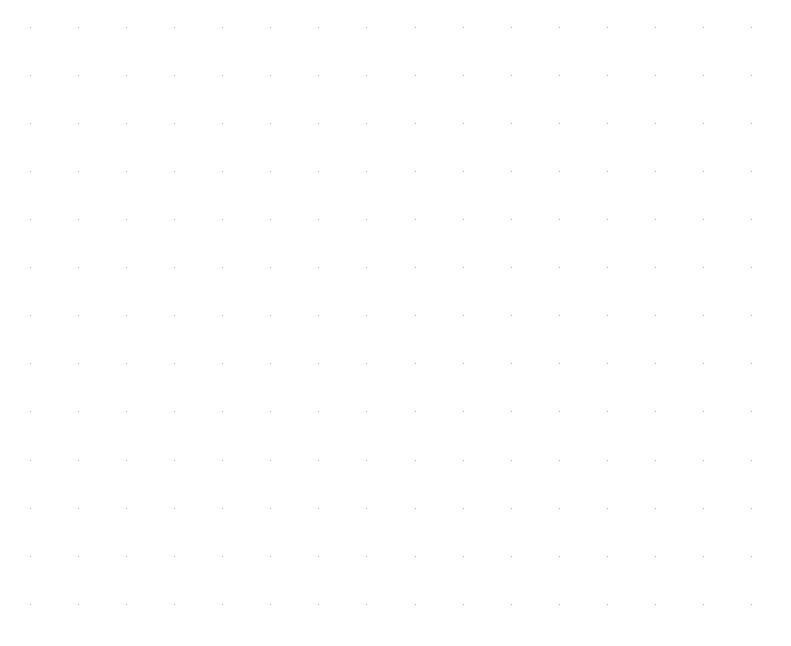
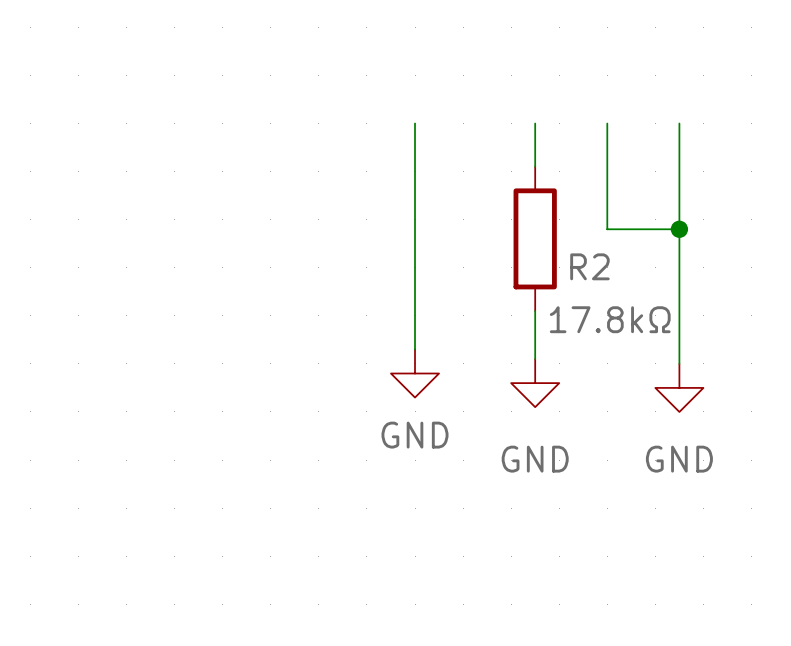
wire: none -> (415, 123) (415, 349)
wire: none -> (535, 123) (535, 166)
wire: none -> (607, 123) (607, 229) (679, 229)
wire: none -> (679, 123) (679, 363)
junction: none -> (679, 229)
R2: none -> 17.8kΩ (535, 238)
wire: none -> (535, 311) (535, 359)
power symbol: none -> GND (415, 373)
power symbol: none -> GND (535, 383)
power symbol: none -> GND (679, 387)

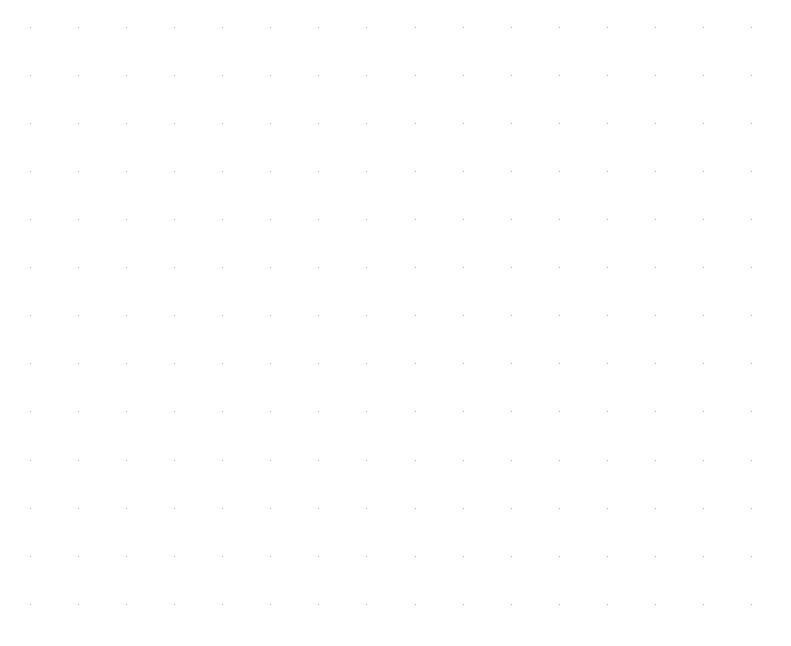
wire: (415, 123) (415, 349) -> none
wire: (535, 123) (535, 166) -> none
wire: (607, 123) (607, 229) (679, 229) -> none
wire: (679, 123) (679, 363) -> none
junction: (679, 229) -> none
R2: 17.8kΩ (535, 238) -> none
wire: (535, 311) (535, 359) -> none
power symbol: GND (415, 373) -> none
power symbol: GND (535, 383) -> none
power symbol: GND (679, 387) -> none

